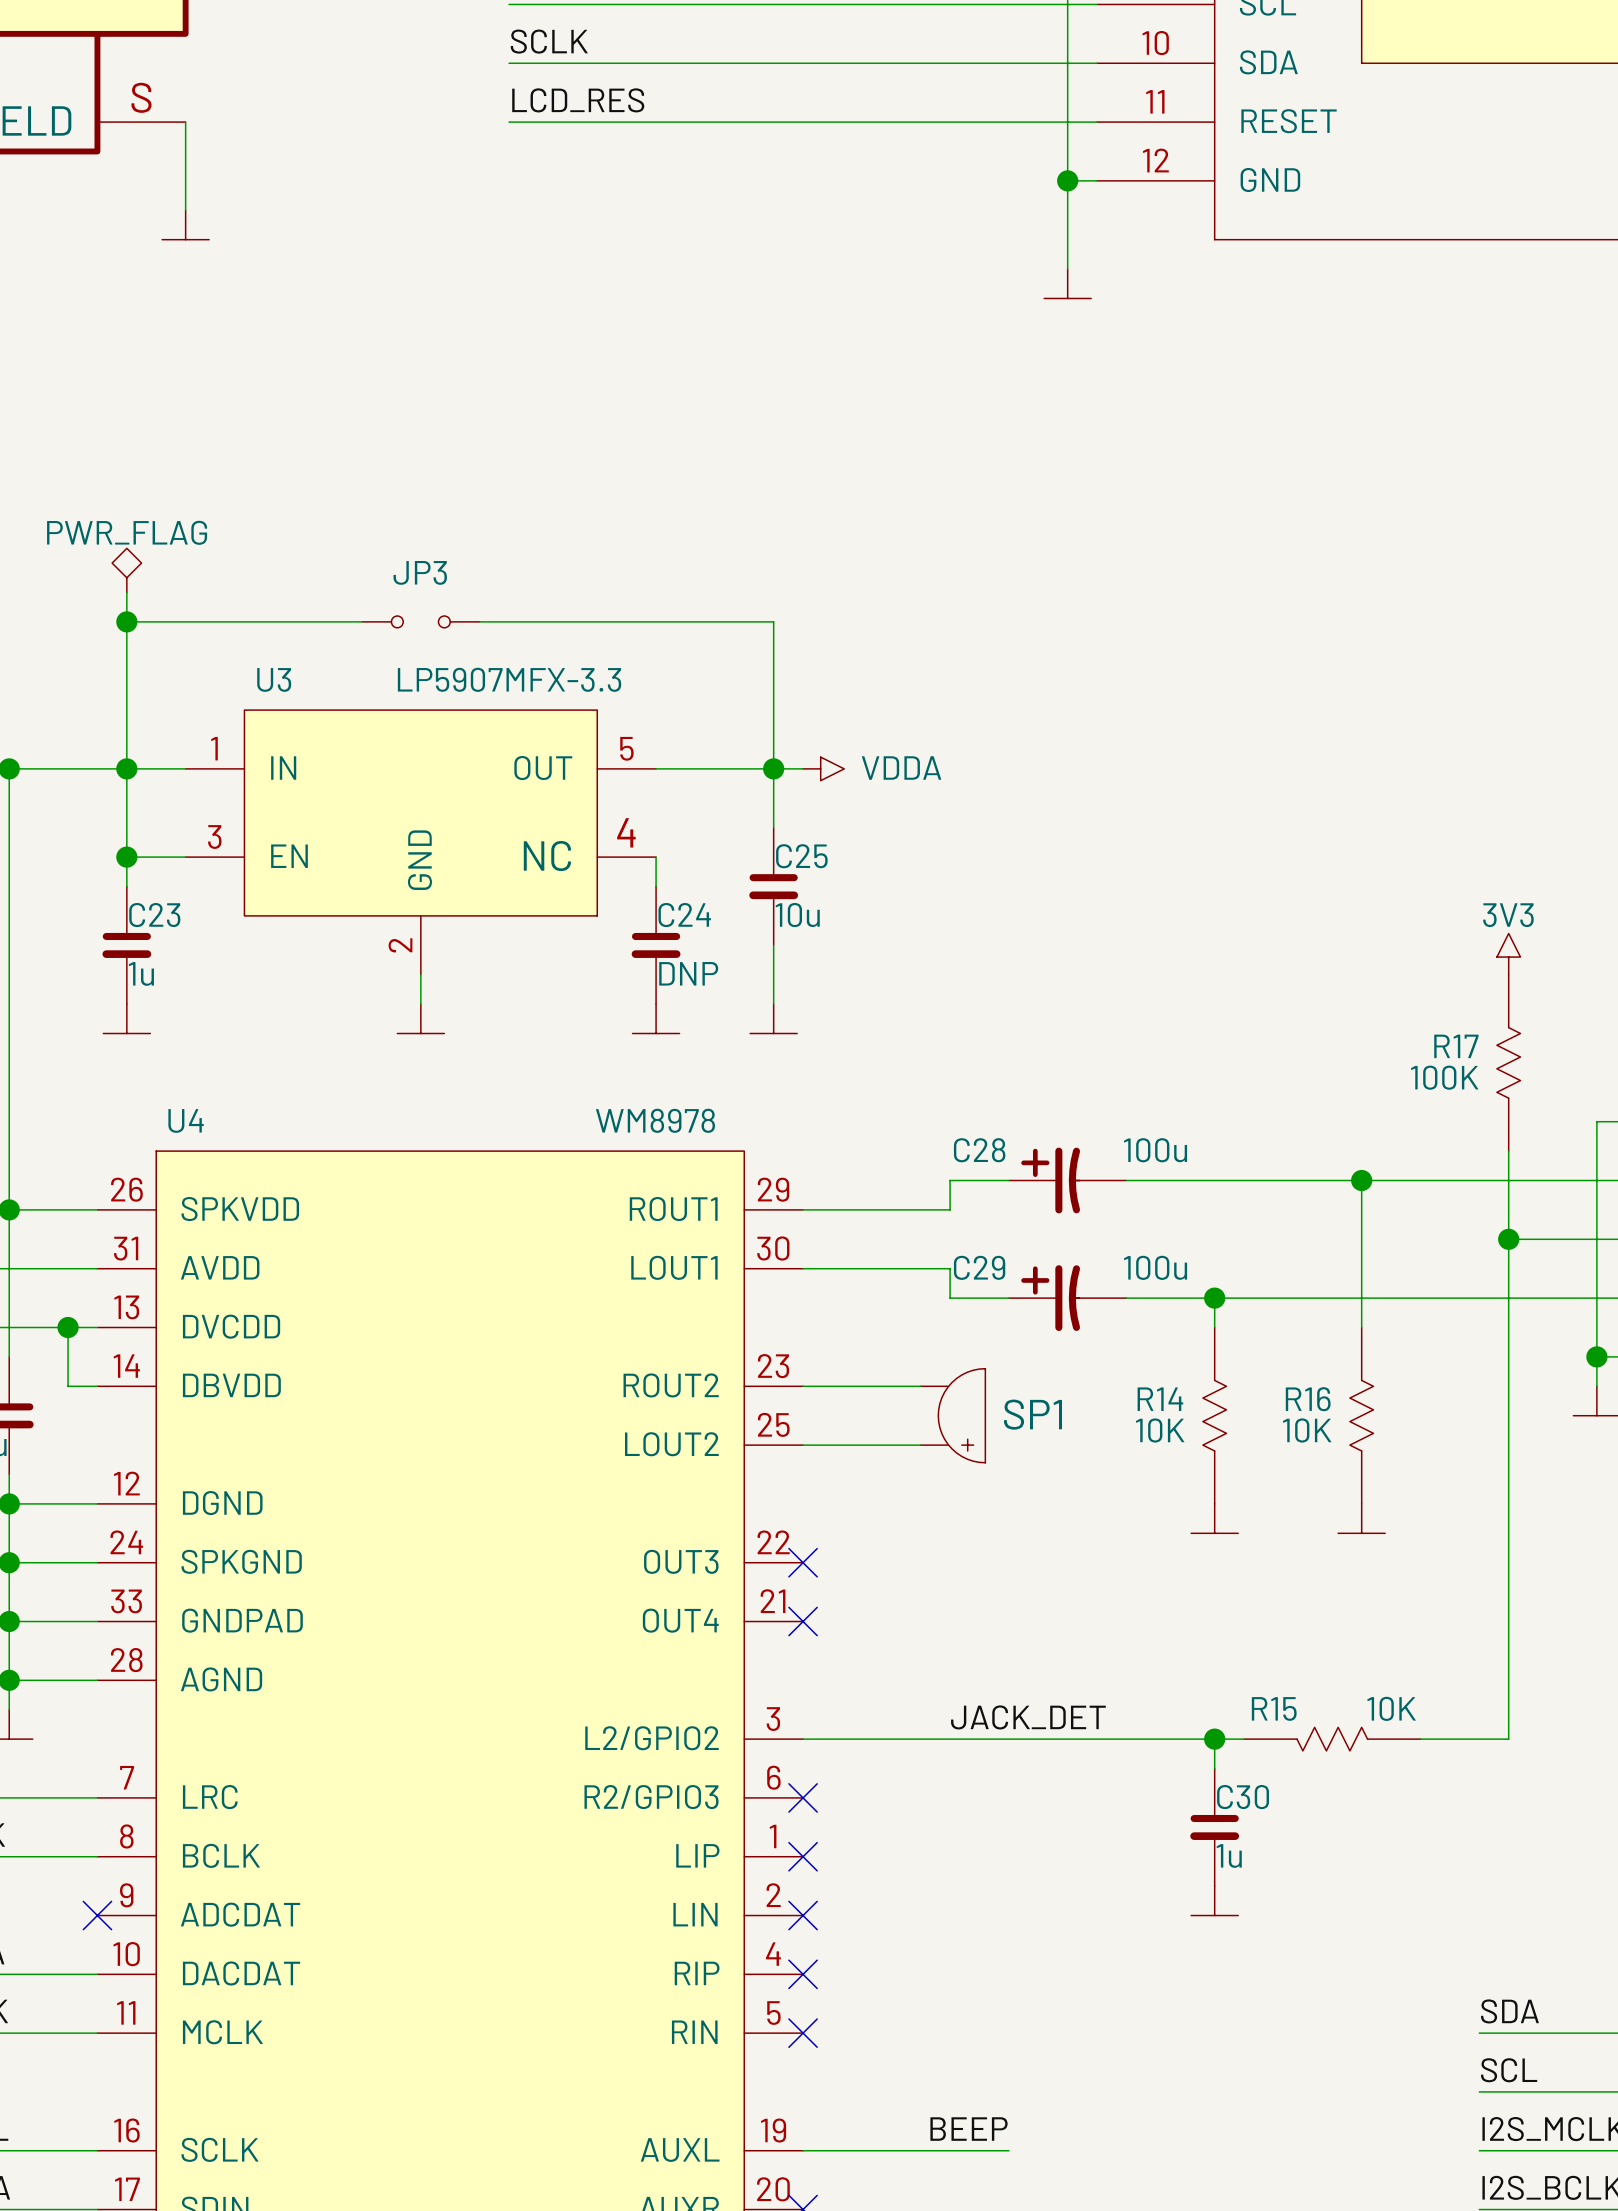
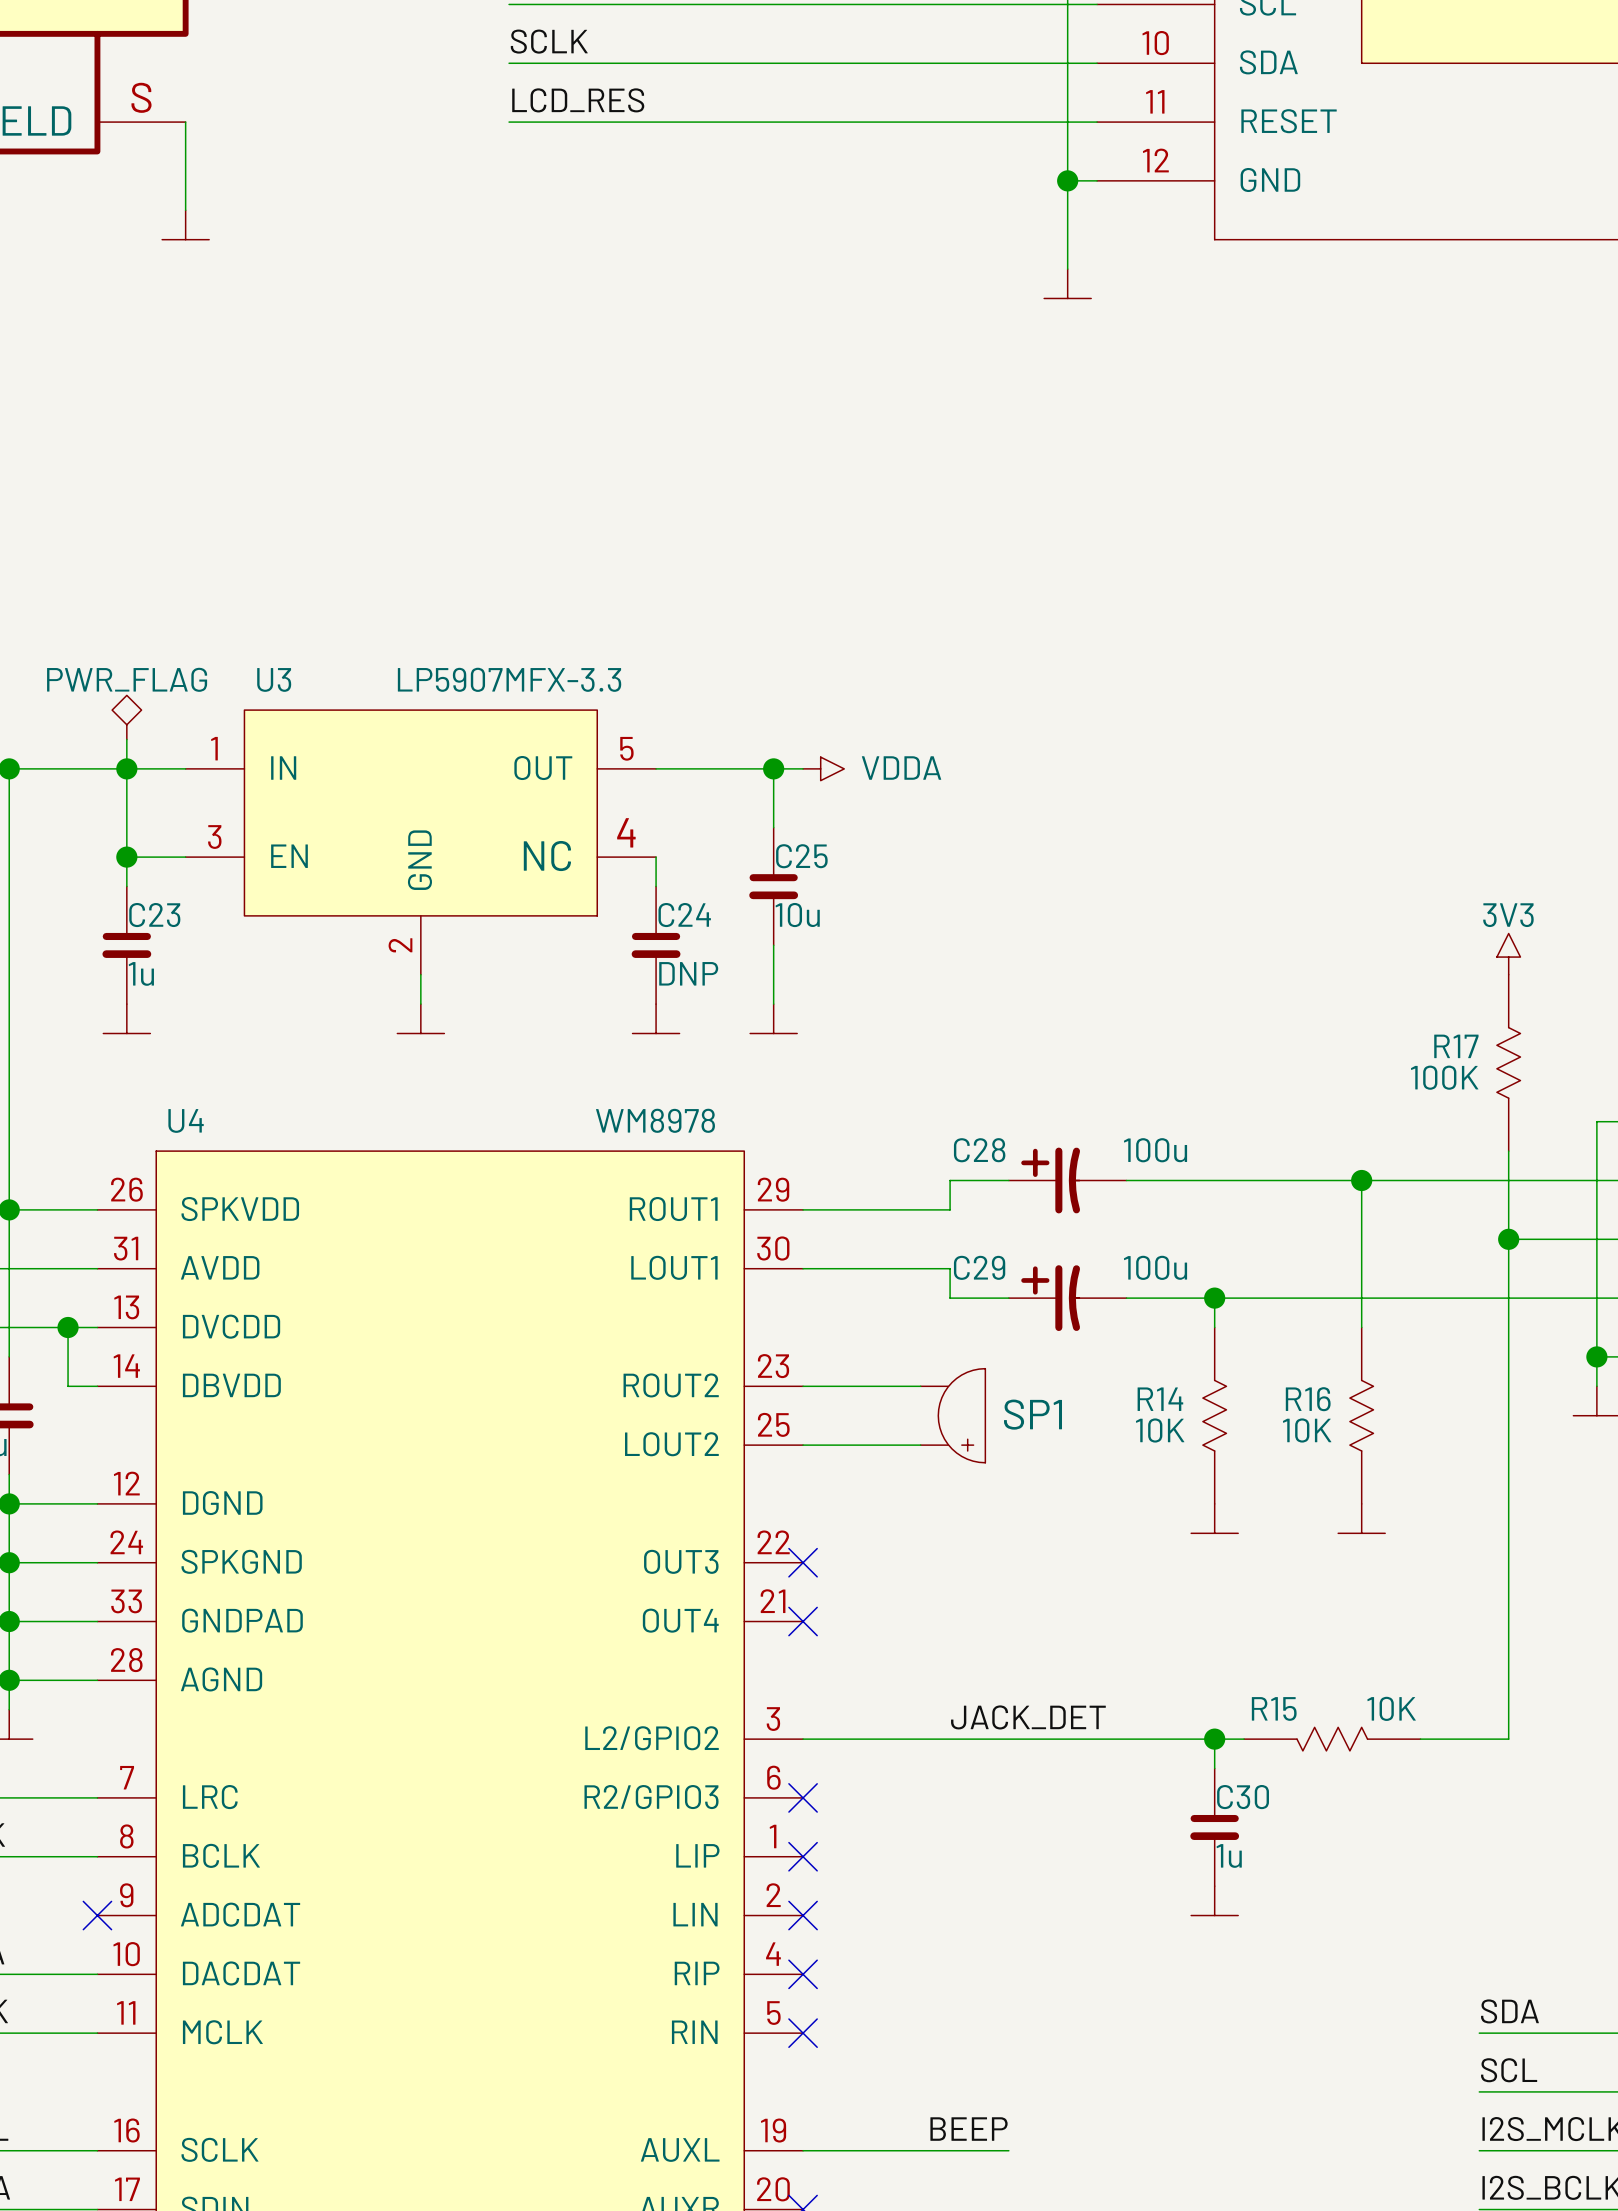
power symbol position: PWR_FLAG (126, 570) -> PWR_FLAG (126, 717)
wire: (126, 592) (126, 739) -> none
wire: (126, 621) (362, 621) -> none
junction: (126, 621) -> none
JP3: (420, 621) -> none
wire: (479, 621) (773, 621) (773, 768) -> none

